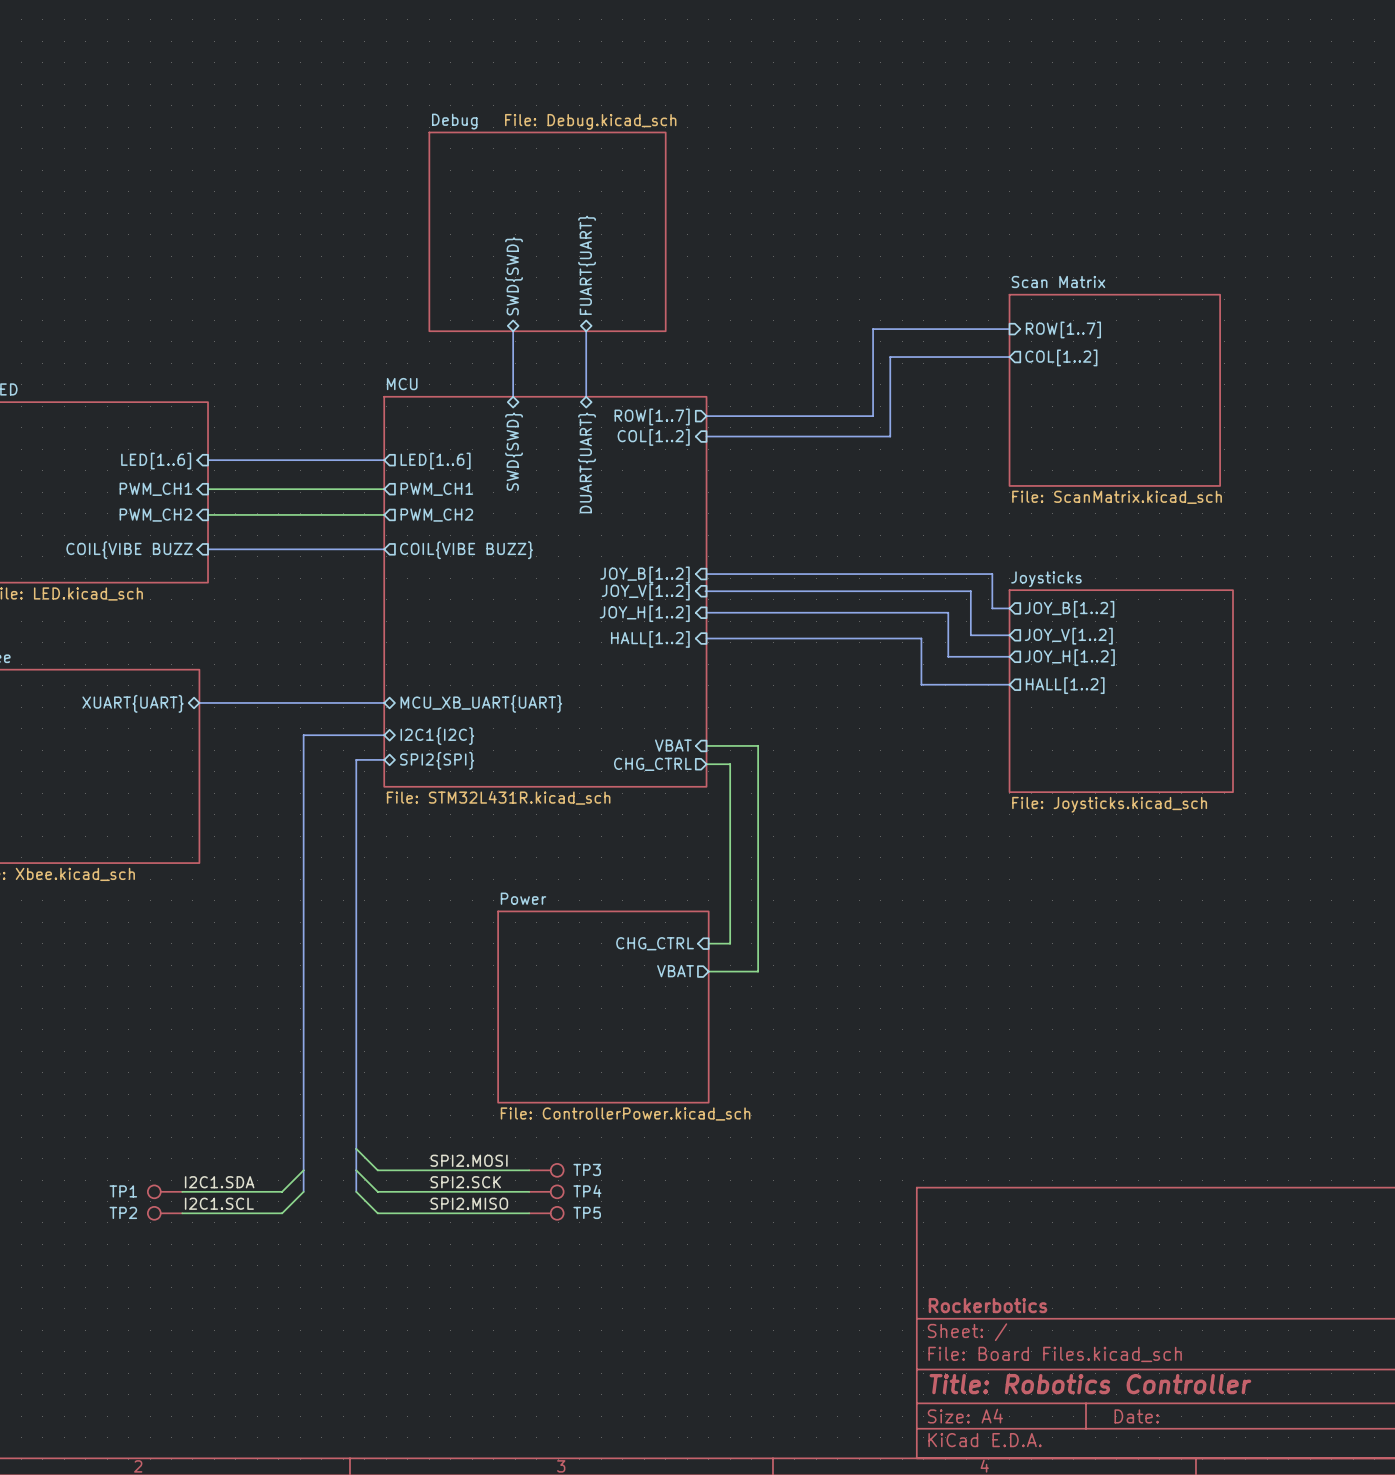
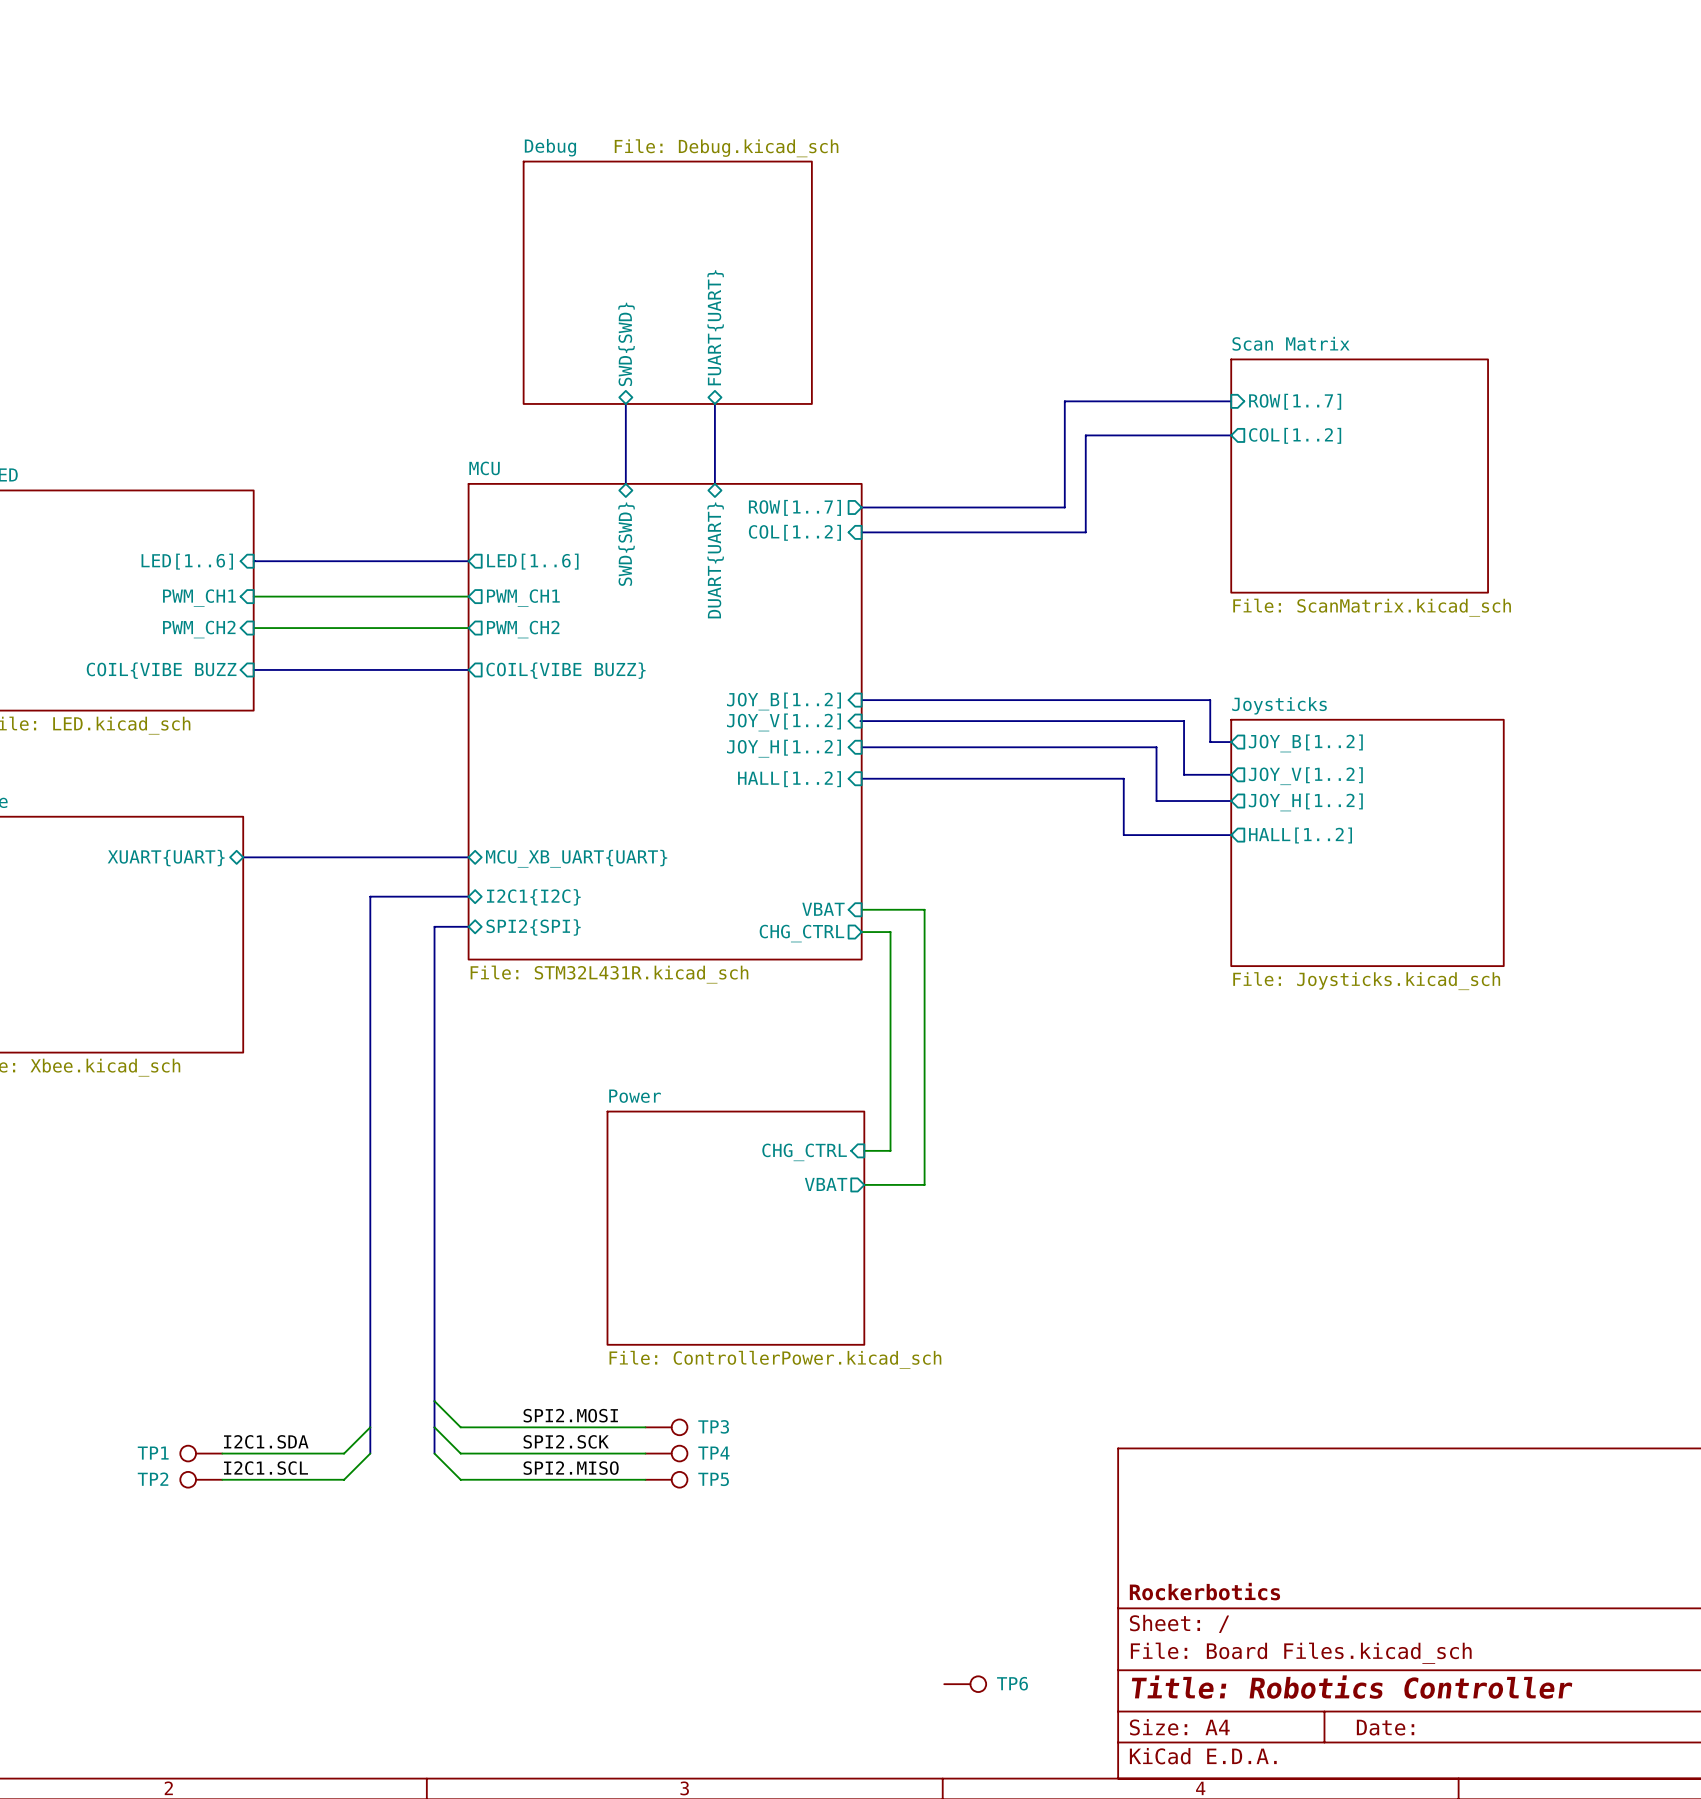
TP6: none -> (965, 1684)

